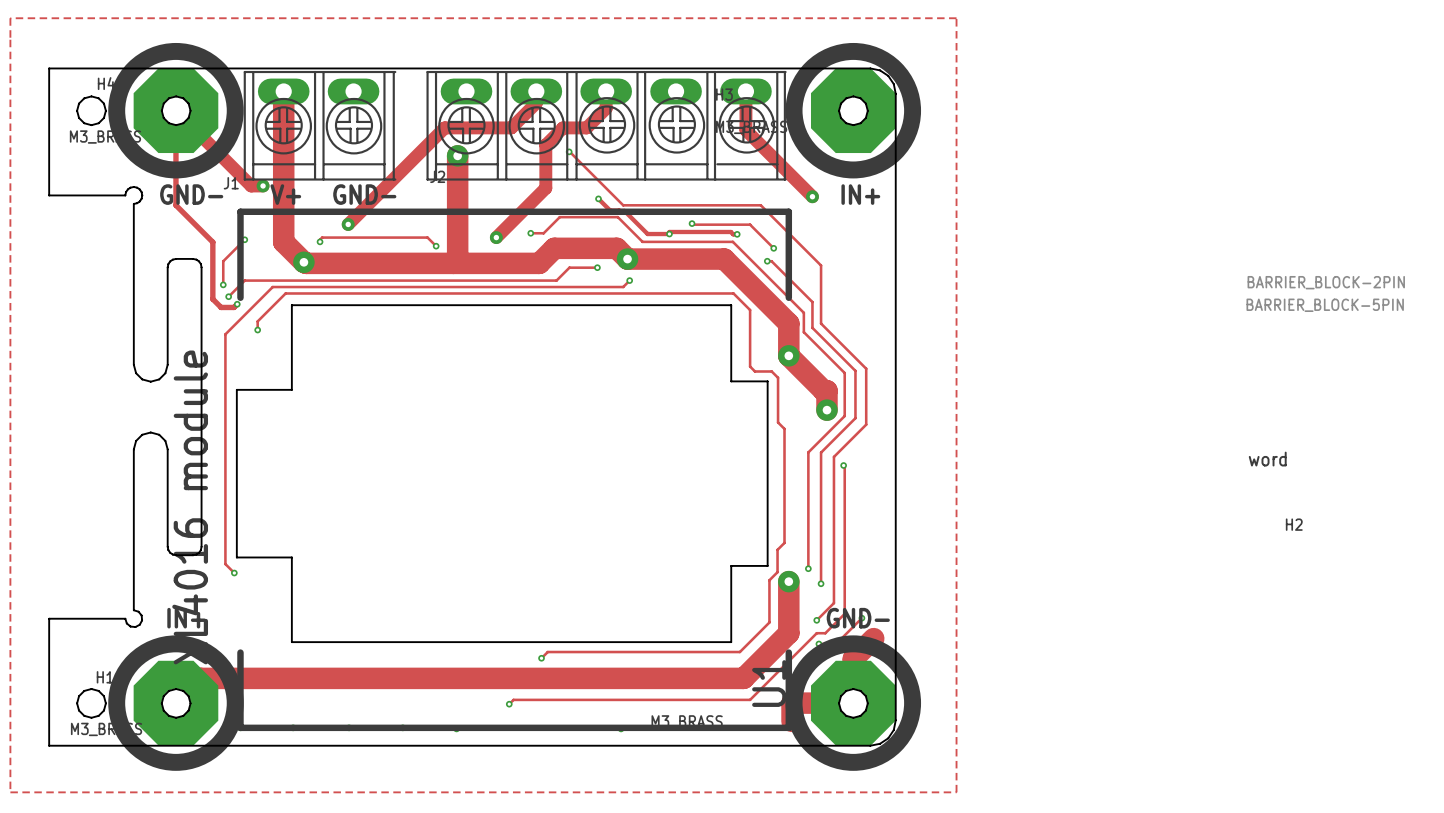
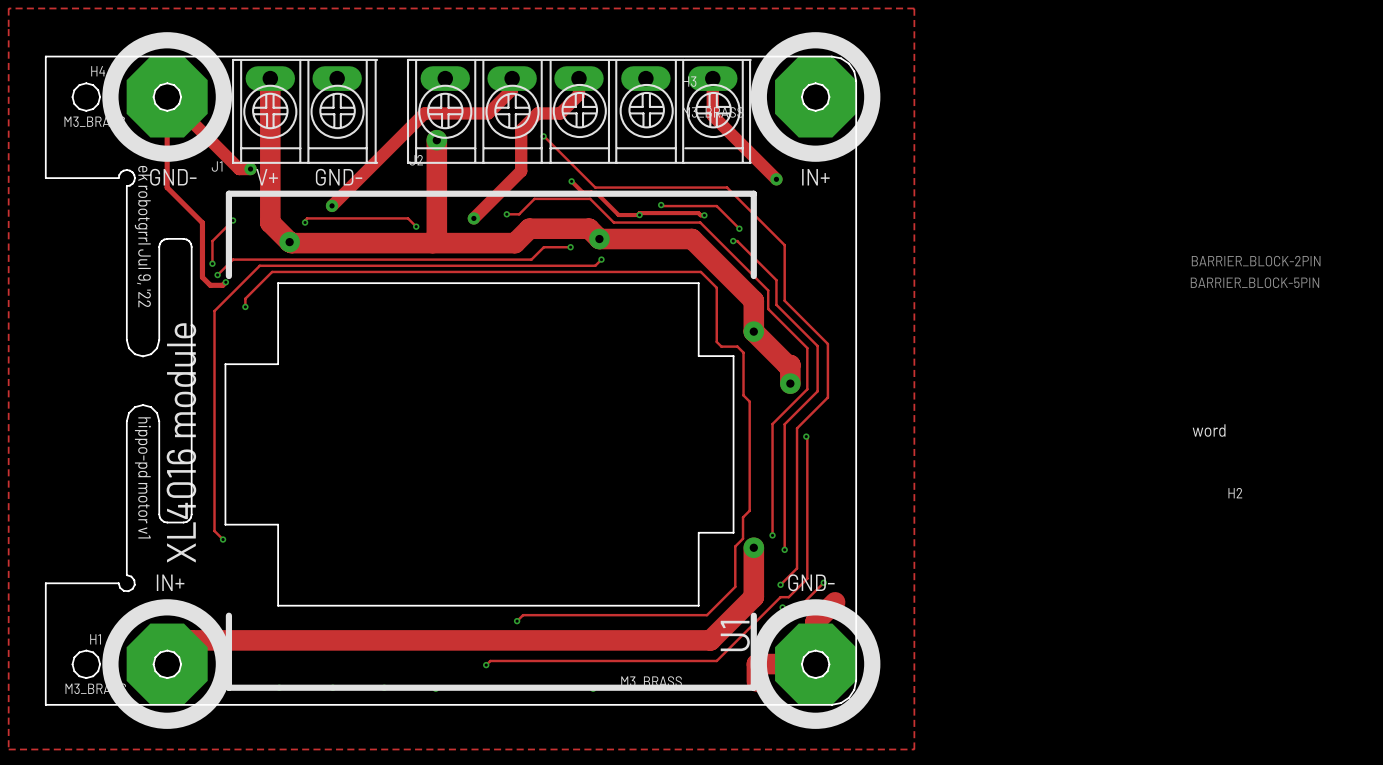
text: none -> ek robotgrrl Jul 9, '22 (142, 236)
text: none -> hippo-pd motor v1 (142, 477)

